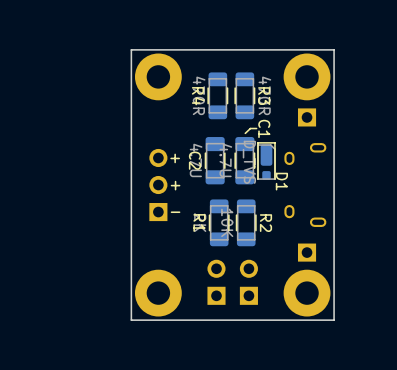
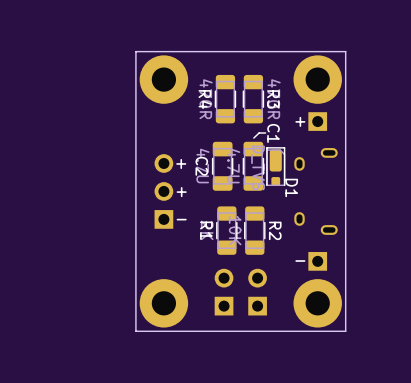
text: none -> + (300, 121)
text: none -> - (300, 261)

